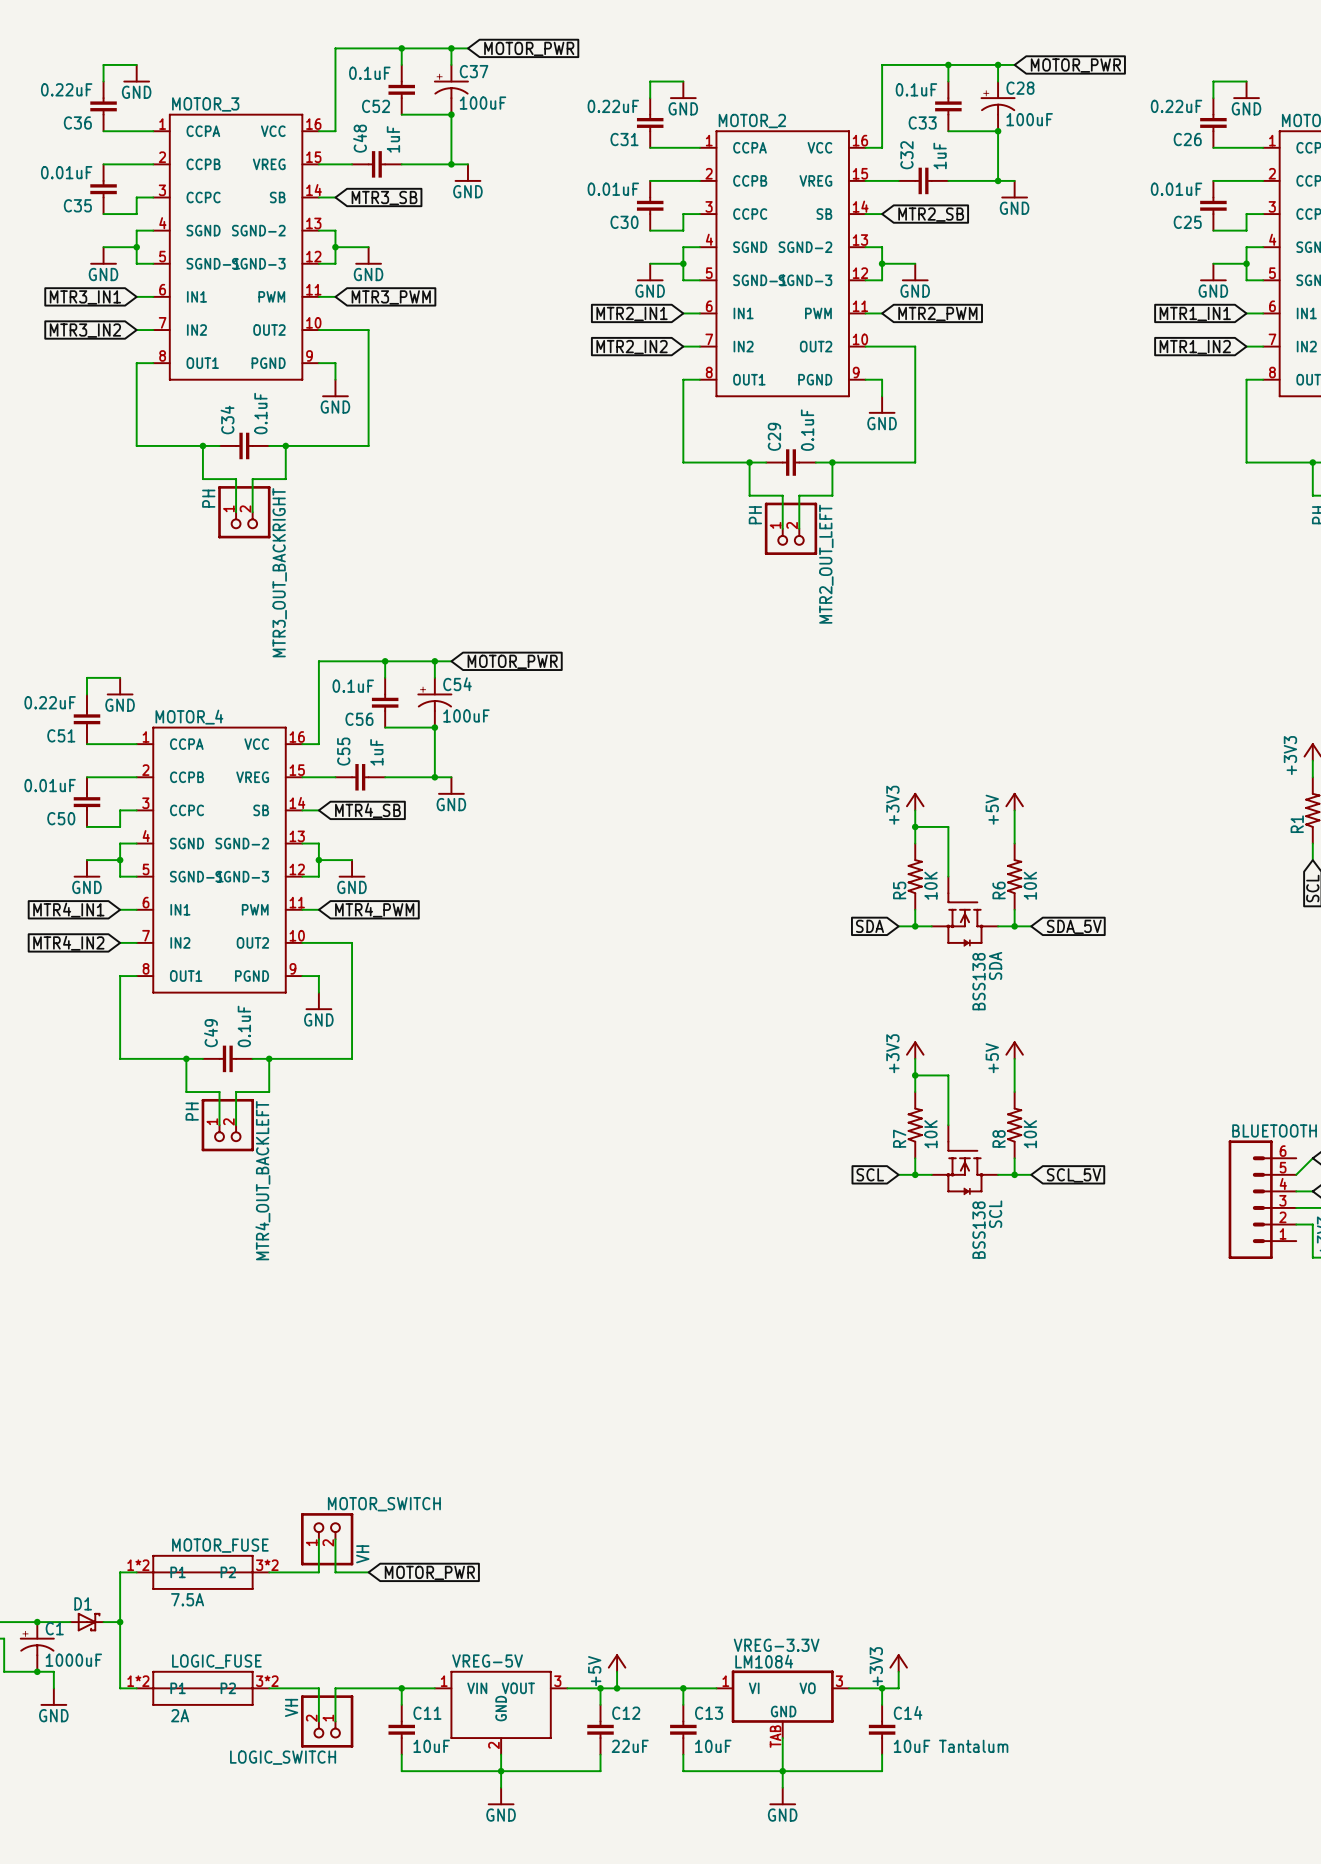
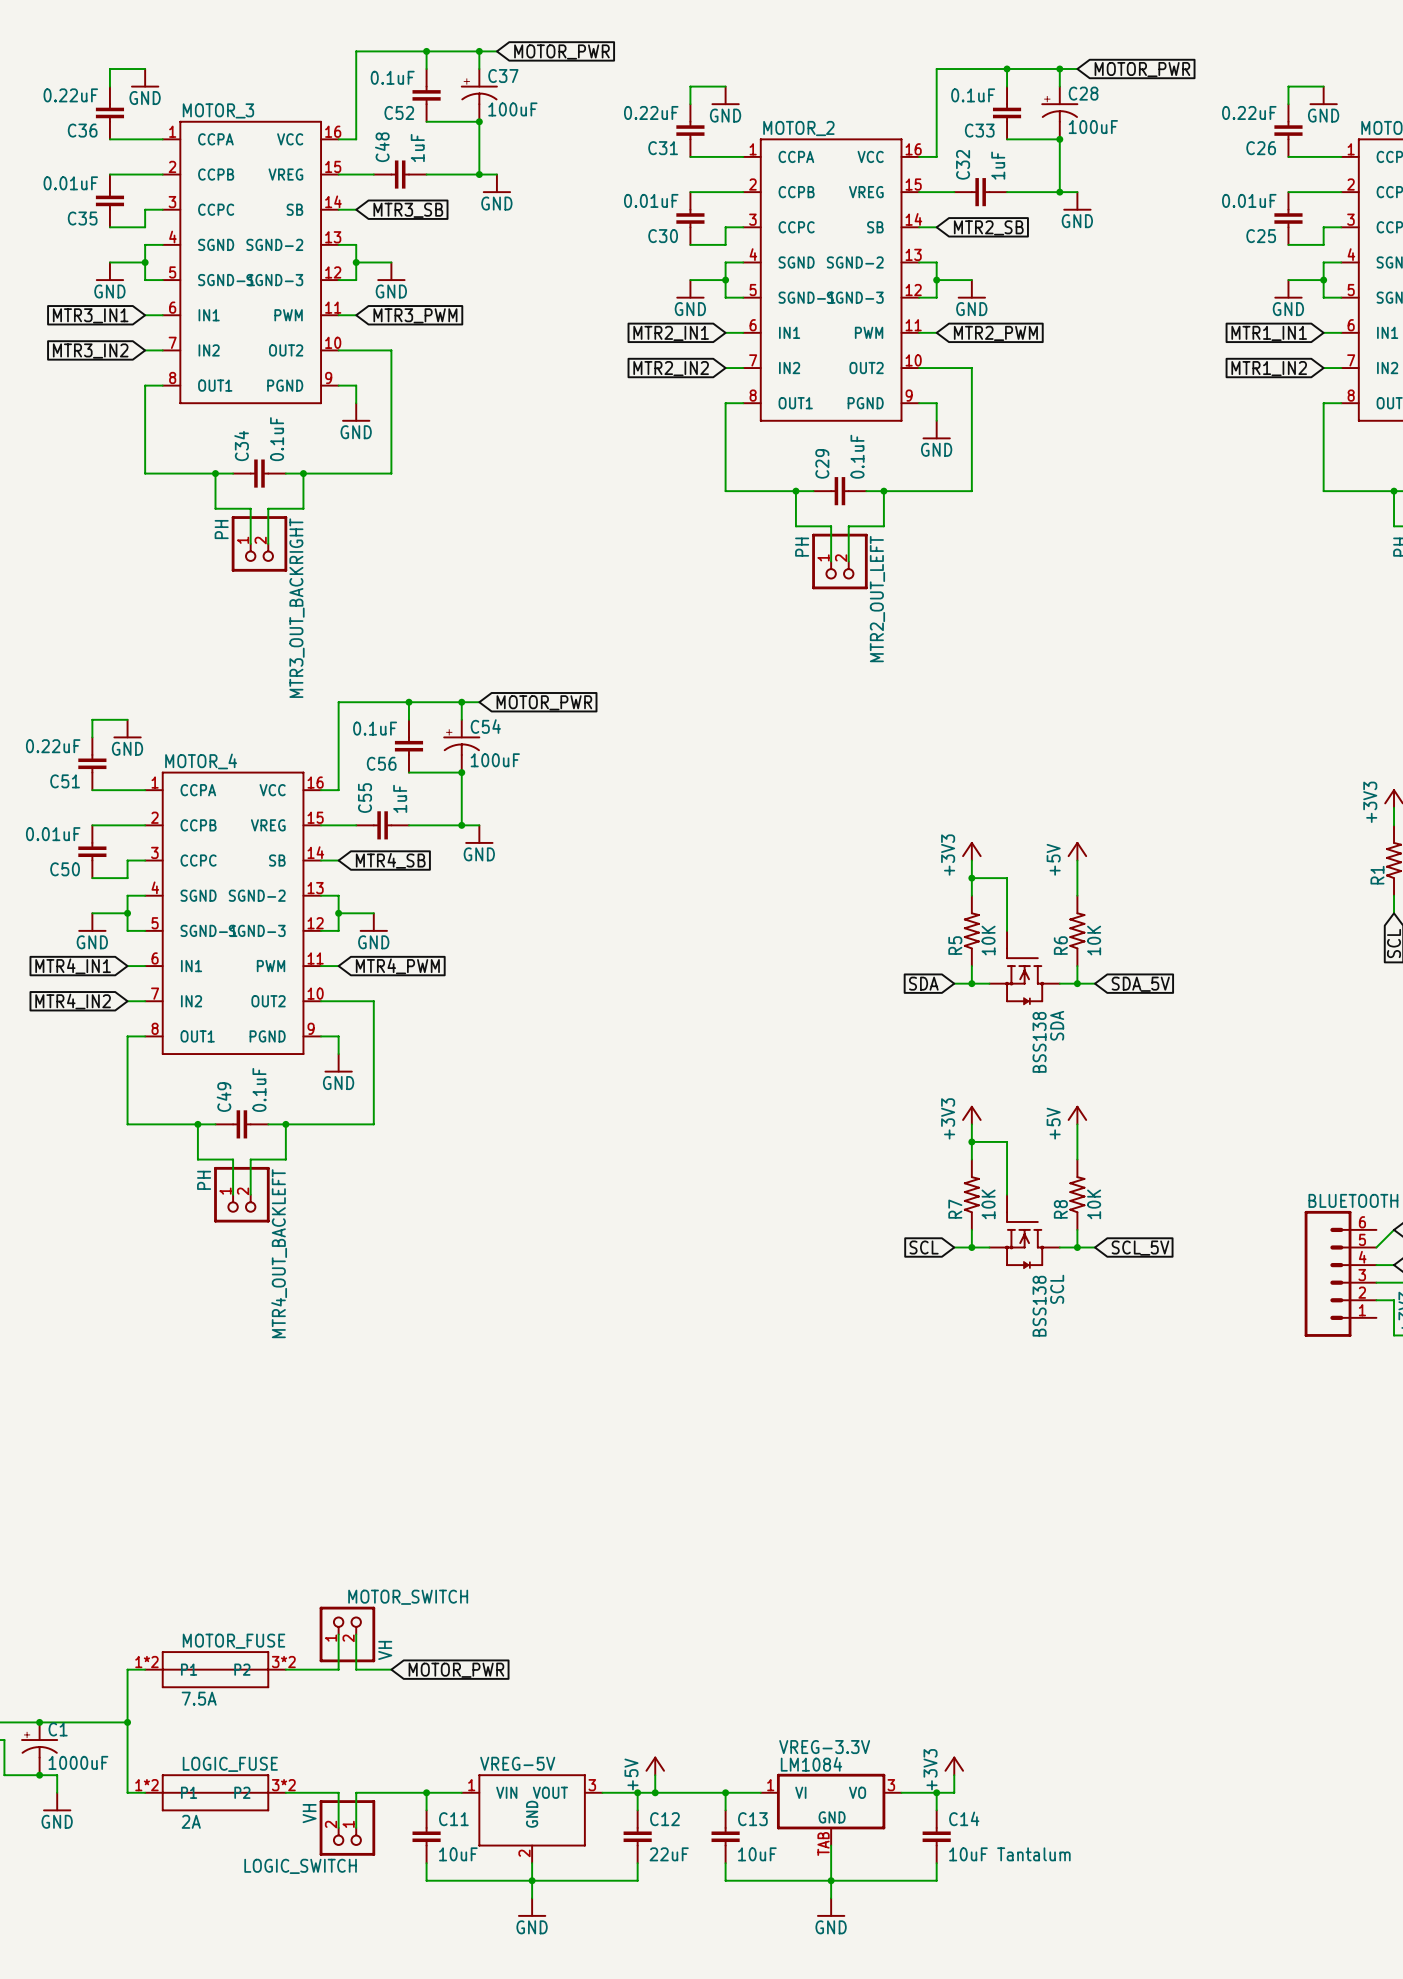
D1: (86, 1622) -> none

